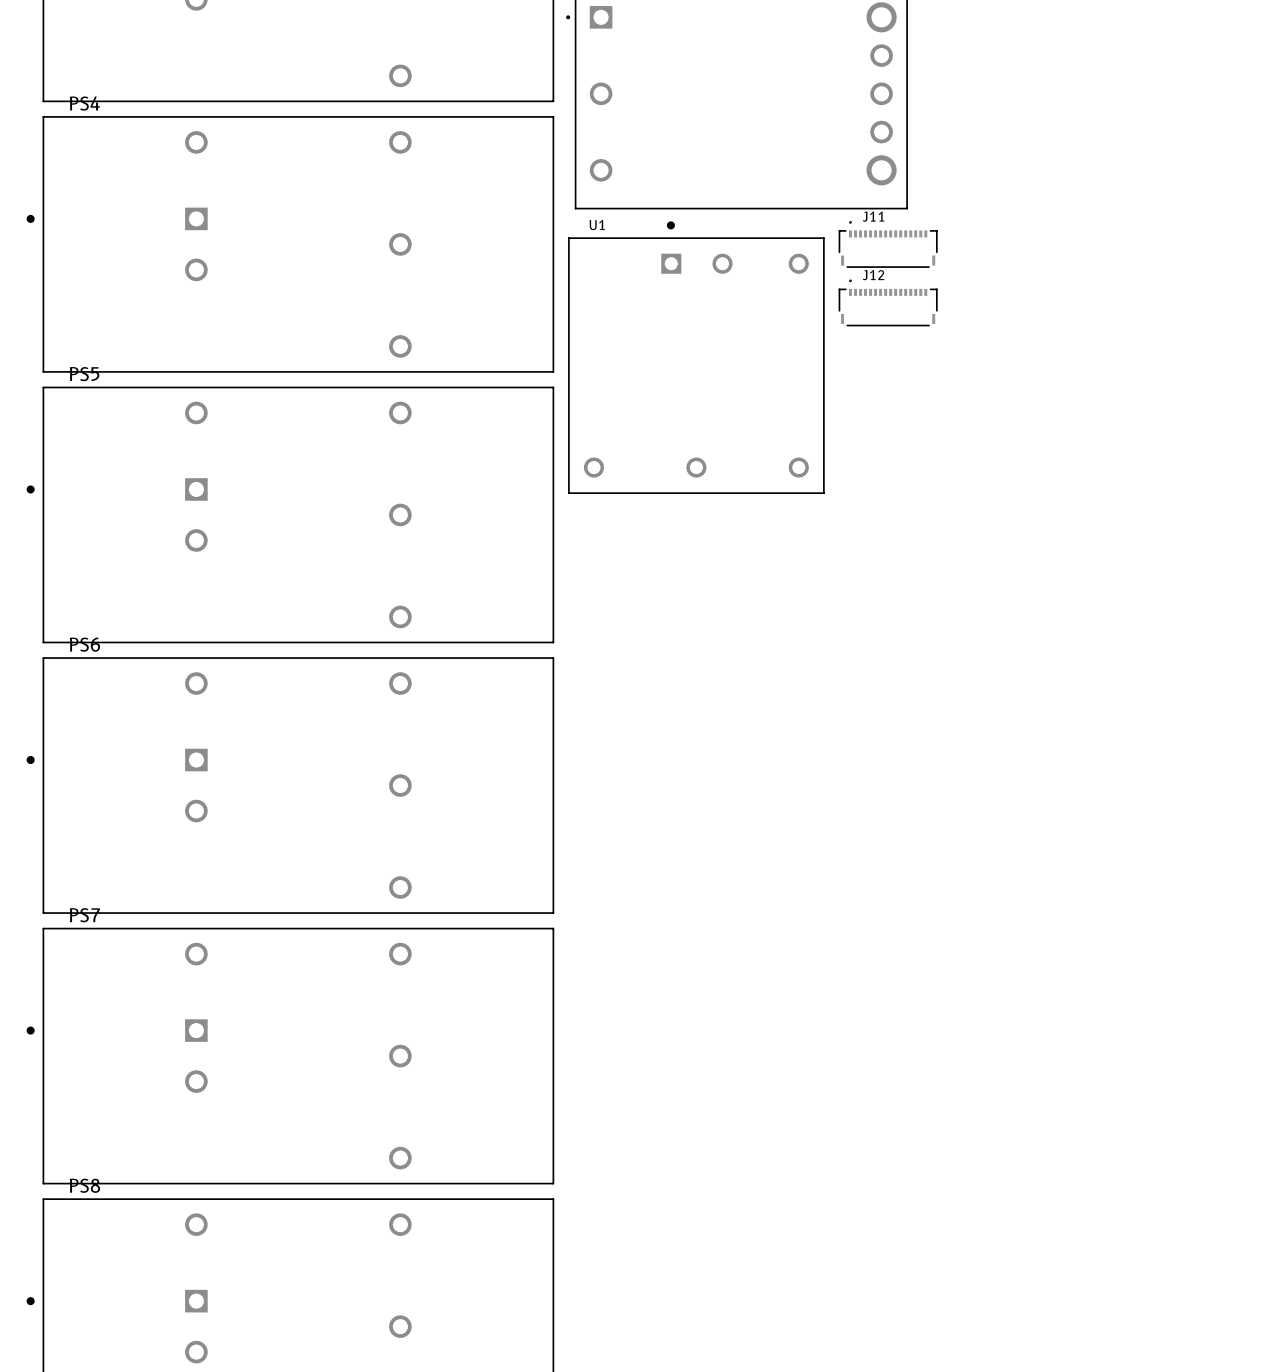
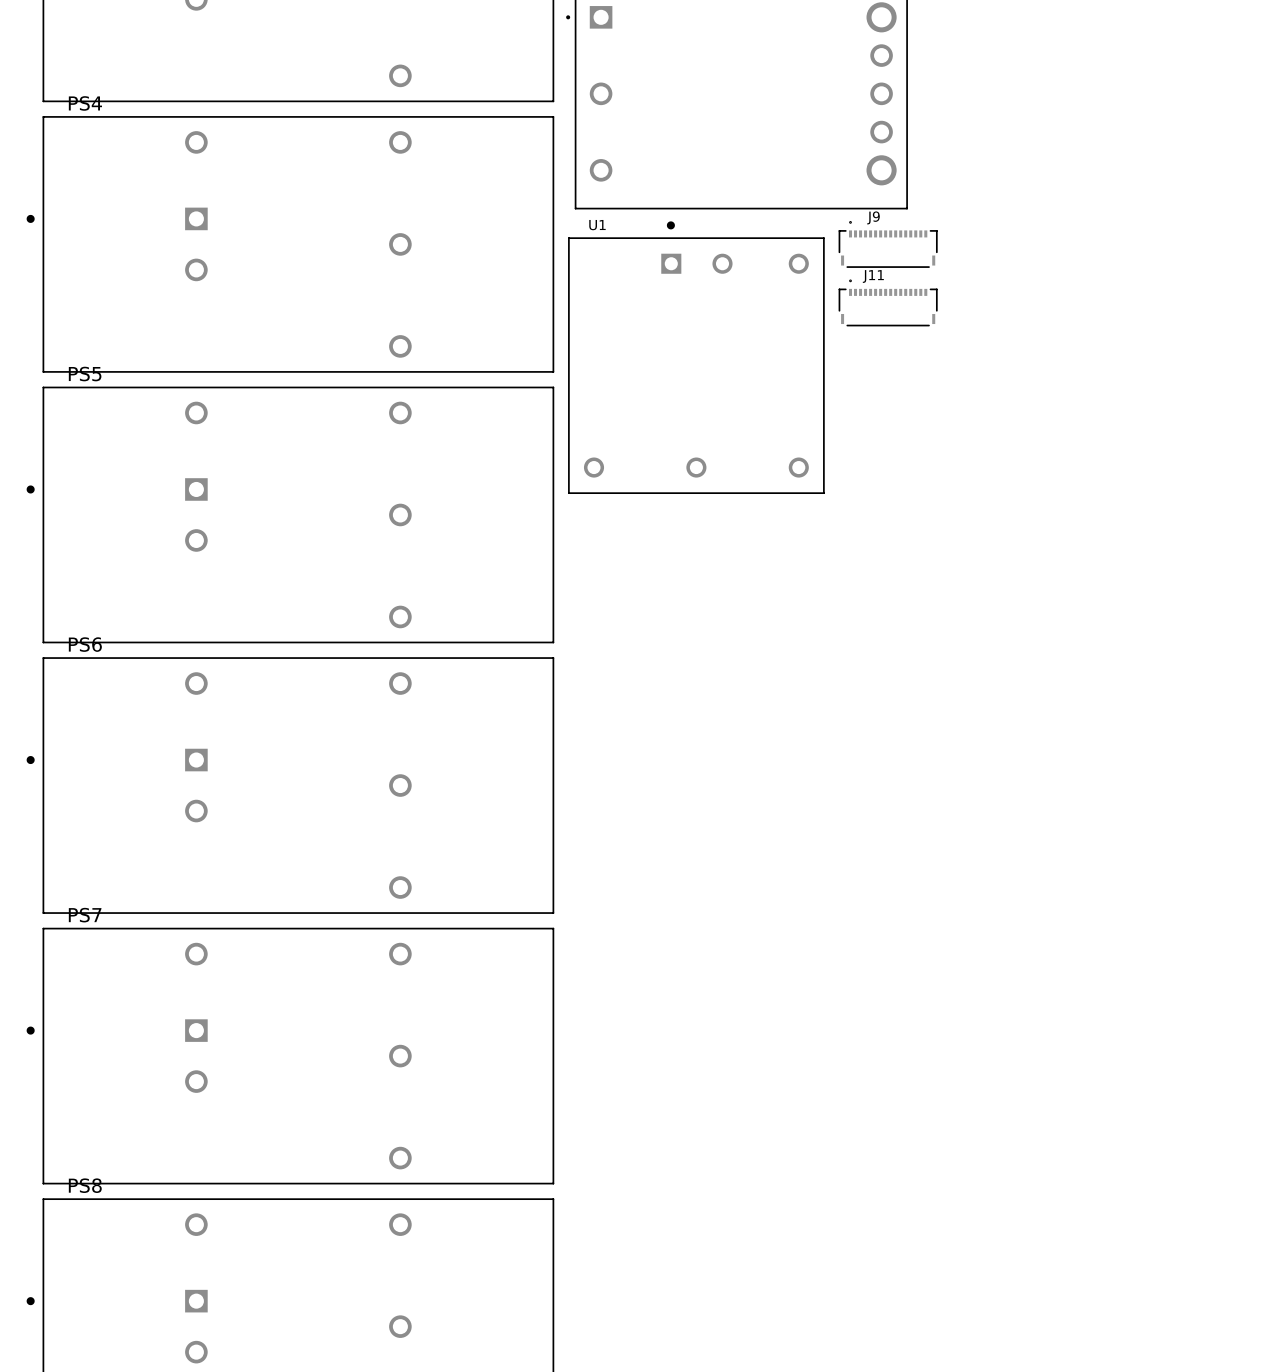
J11 name: J11 (873, 216) -> J9 (873, 217)
J12 name: J12 (873, 275) -> J11 (873, 276)

